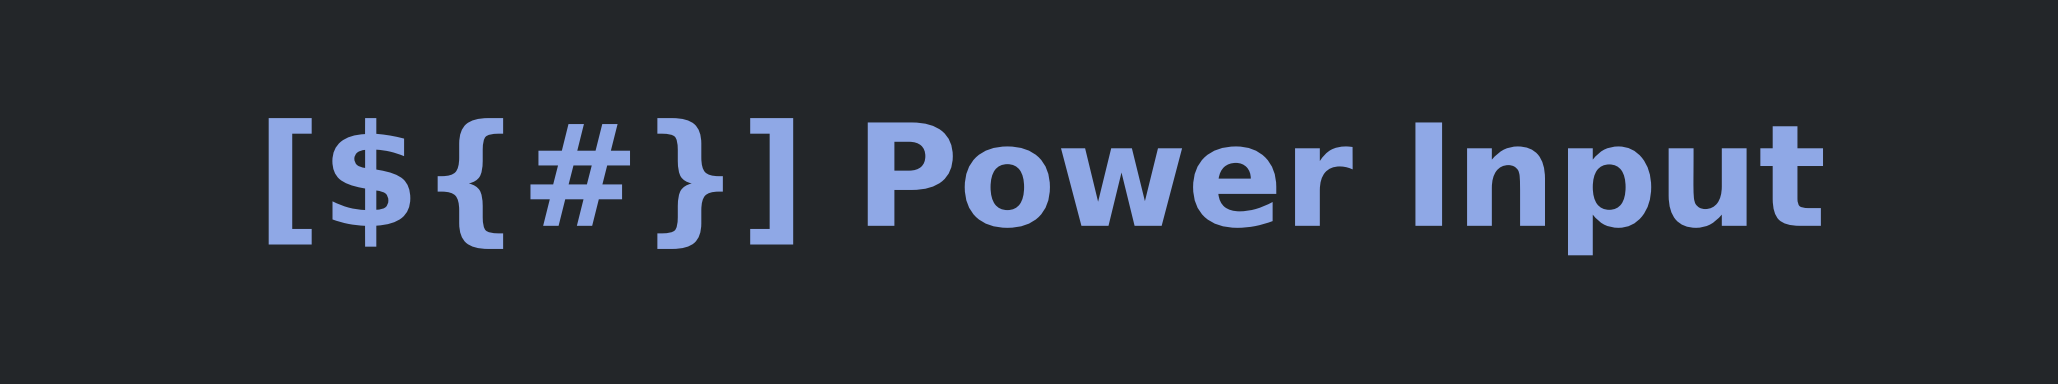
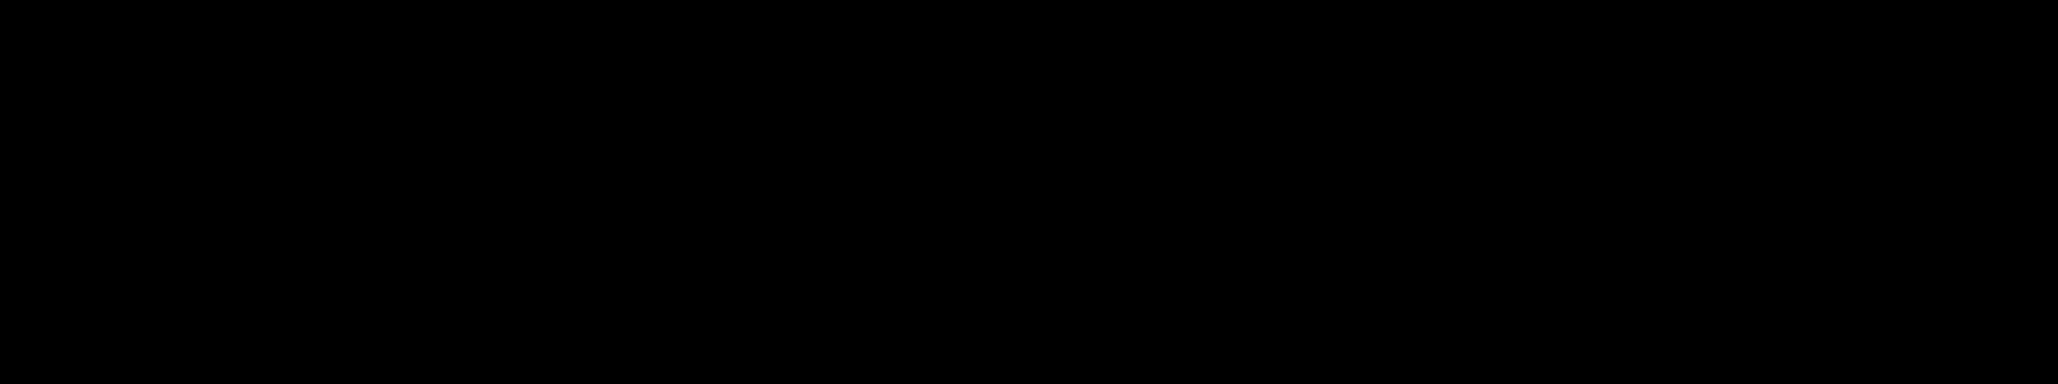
text: [${#}] Power Input (1045, 186) -> none

